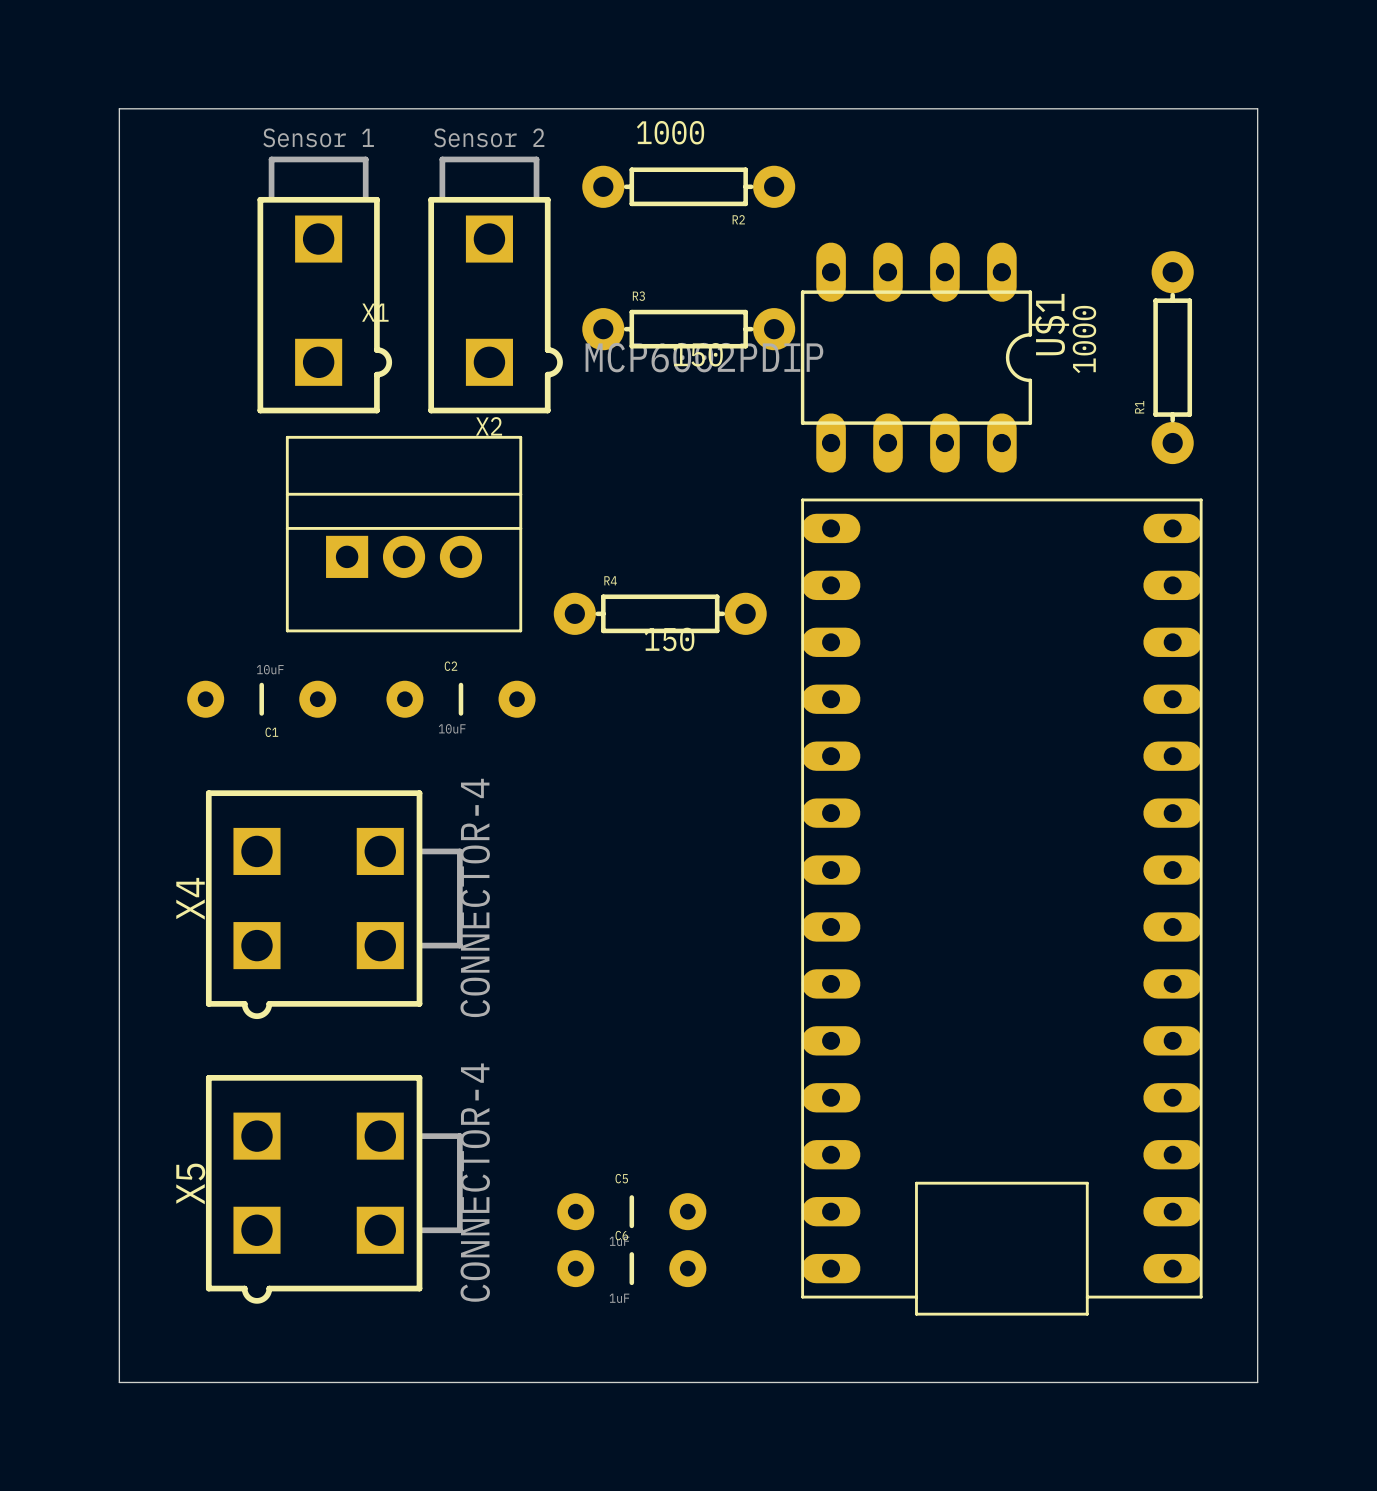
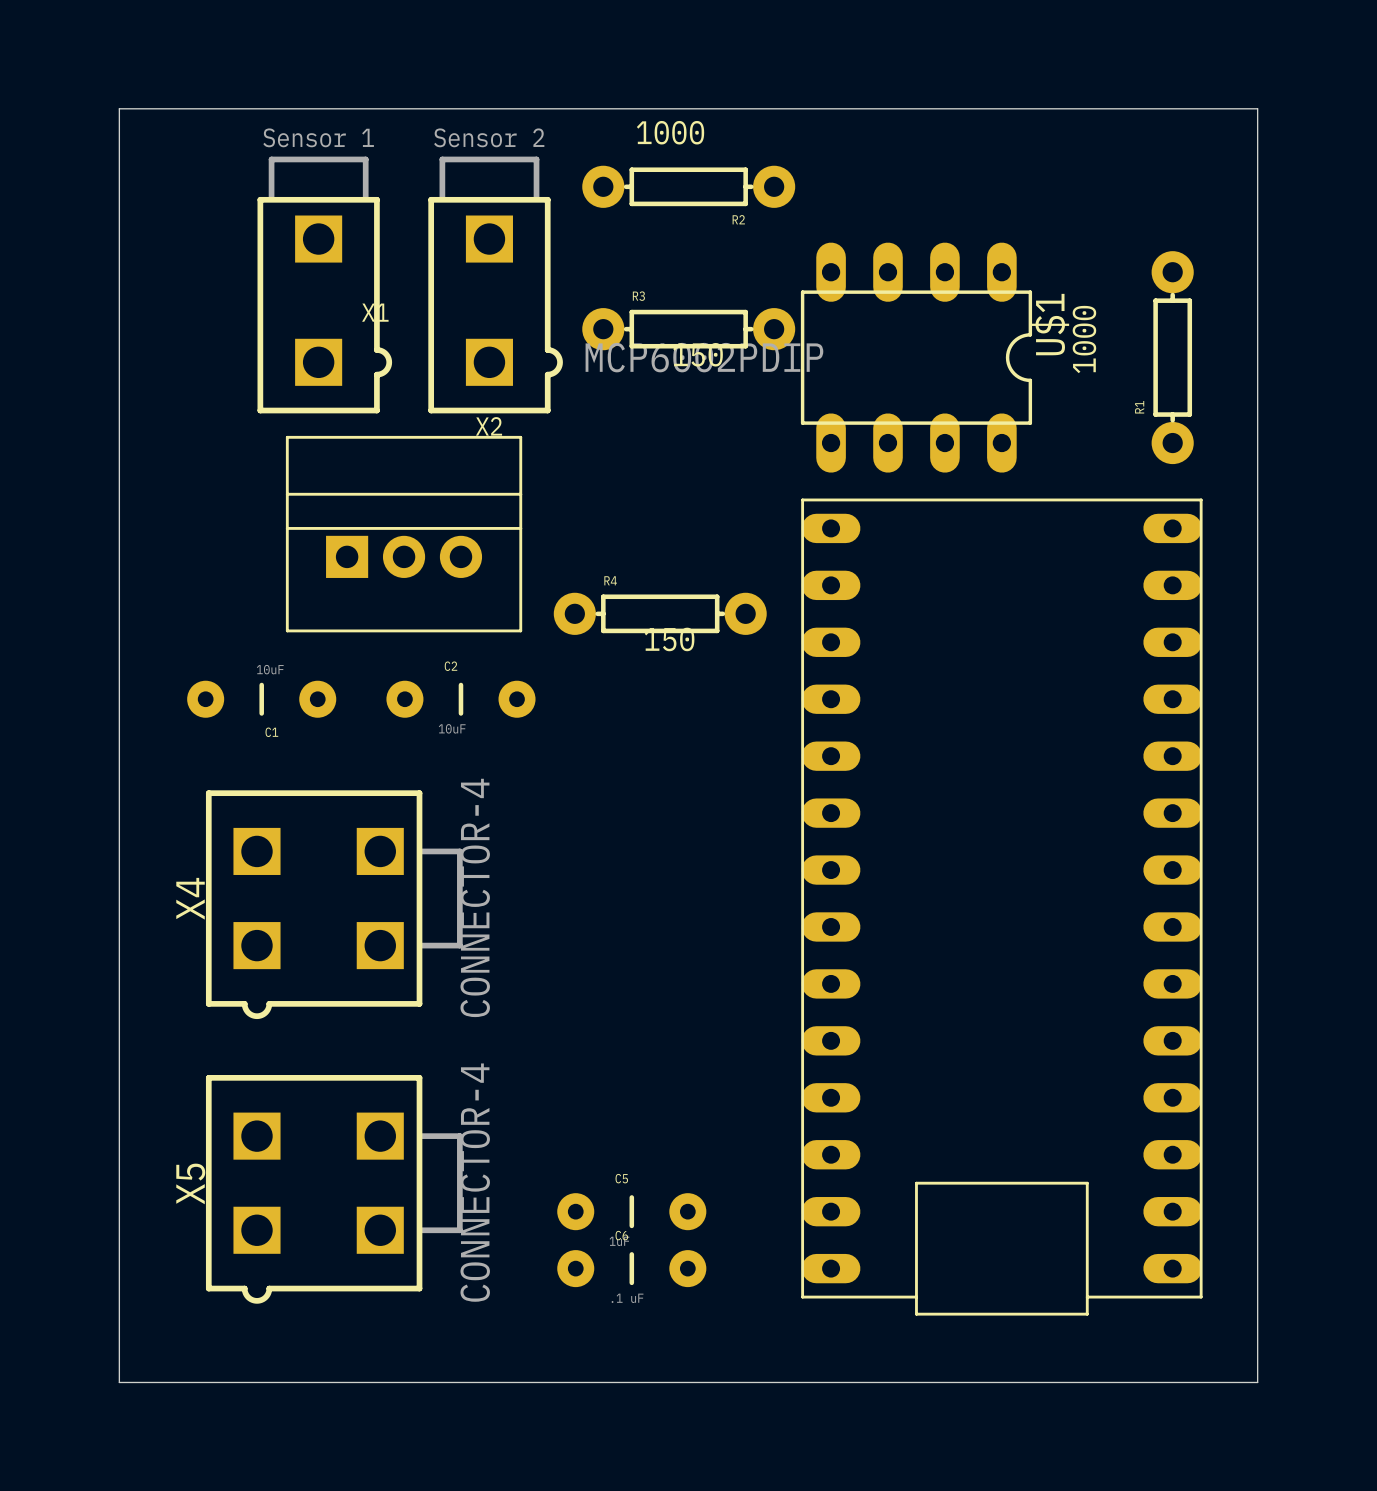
C6 value: 1uF (619, 1298) -> .1 uF (627, 1298)

